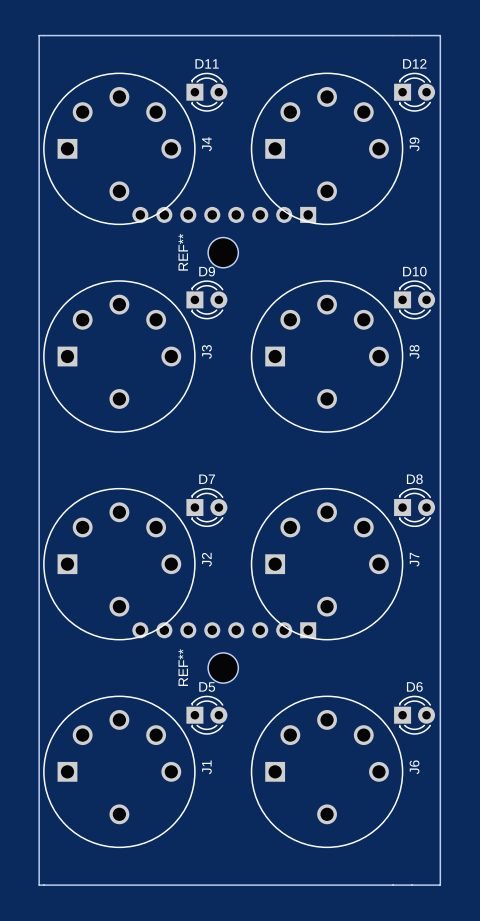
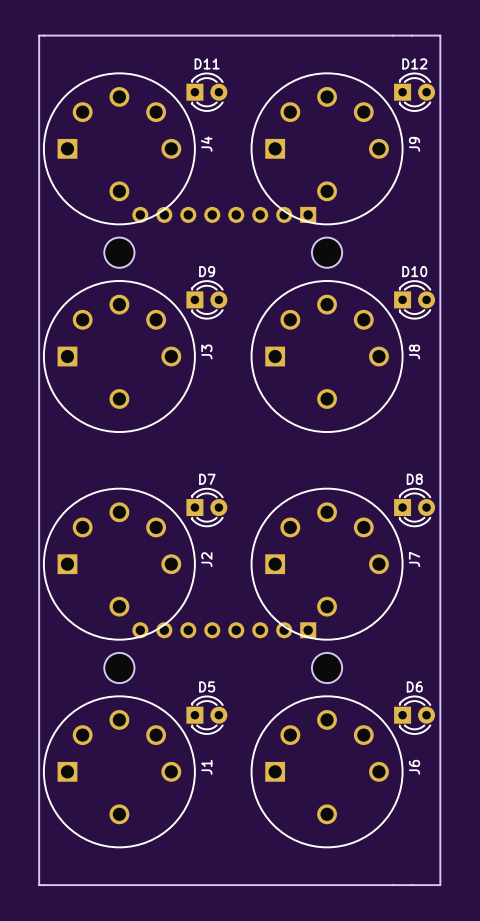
part: none -> (119, 252)
REF**: (223, 252) -> none
part: none -> (327, 252)
part: none -> (119, 668)
REF**: (223, 668) -> none
part: none -> (327, 668)

